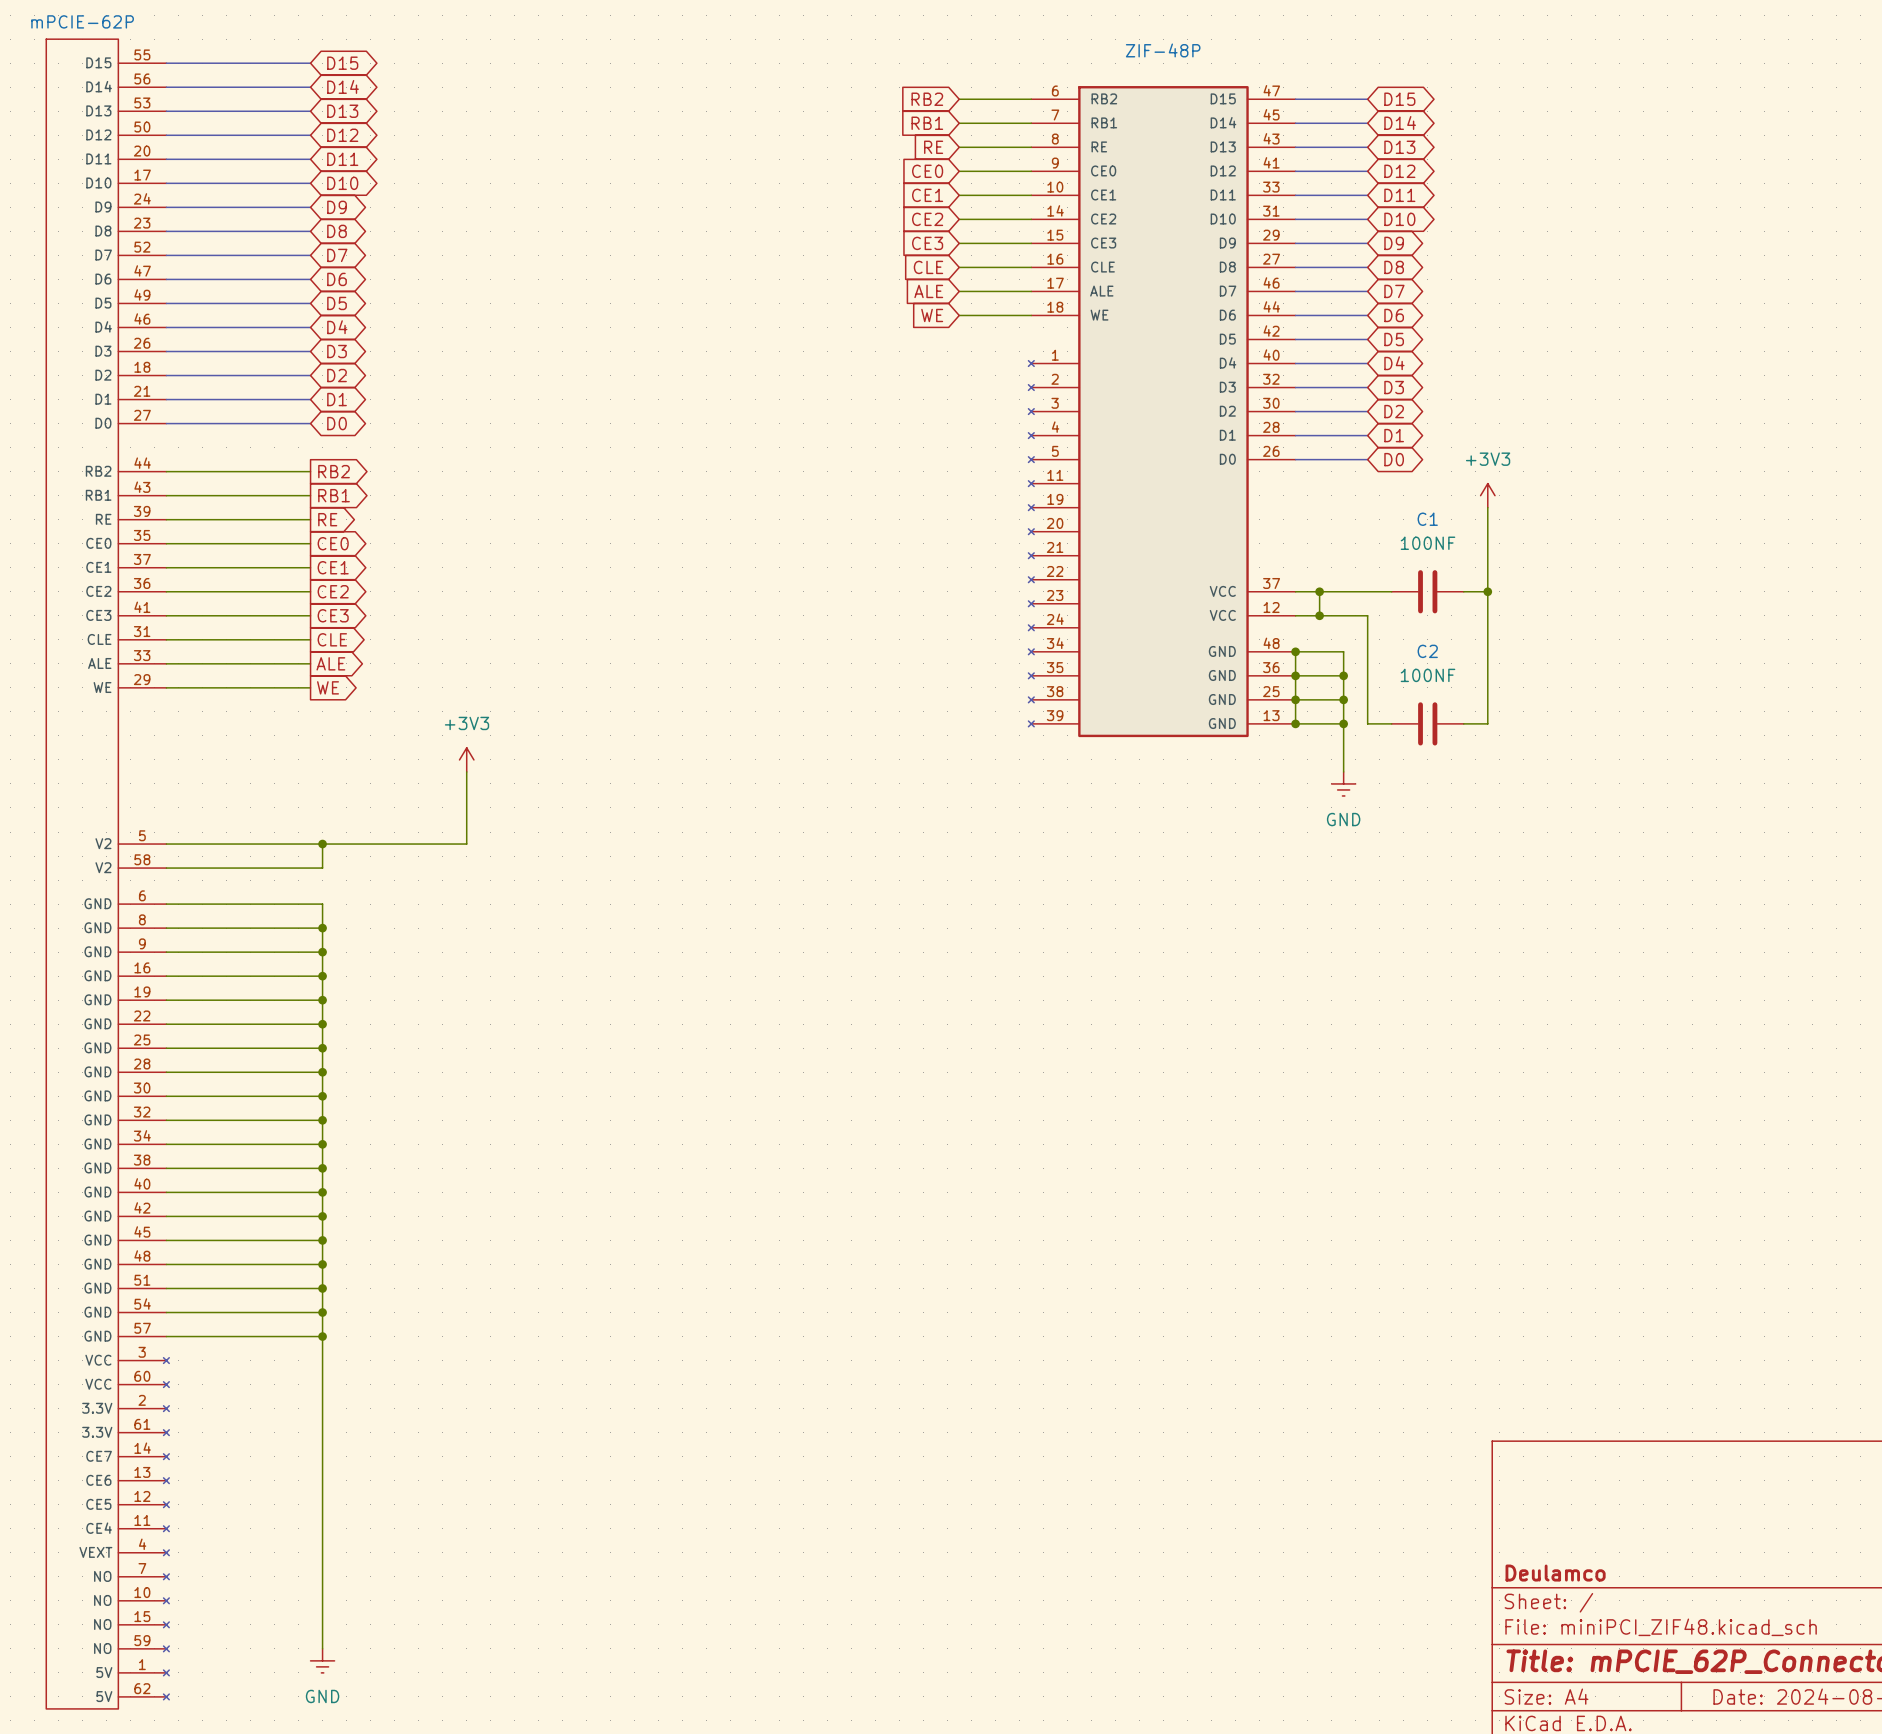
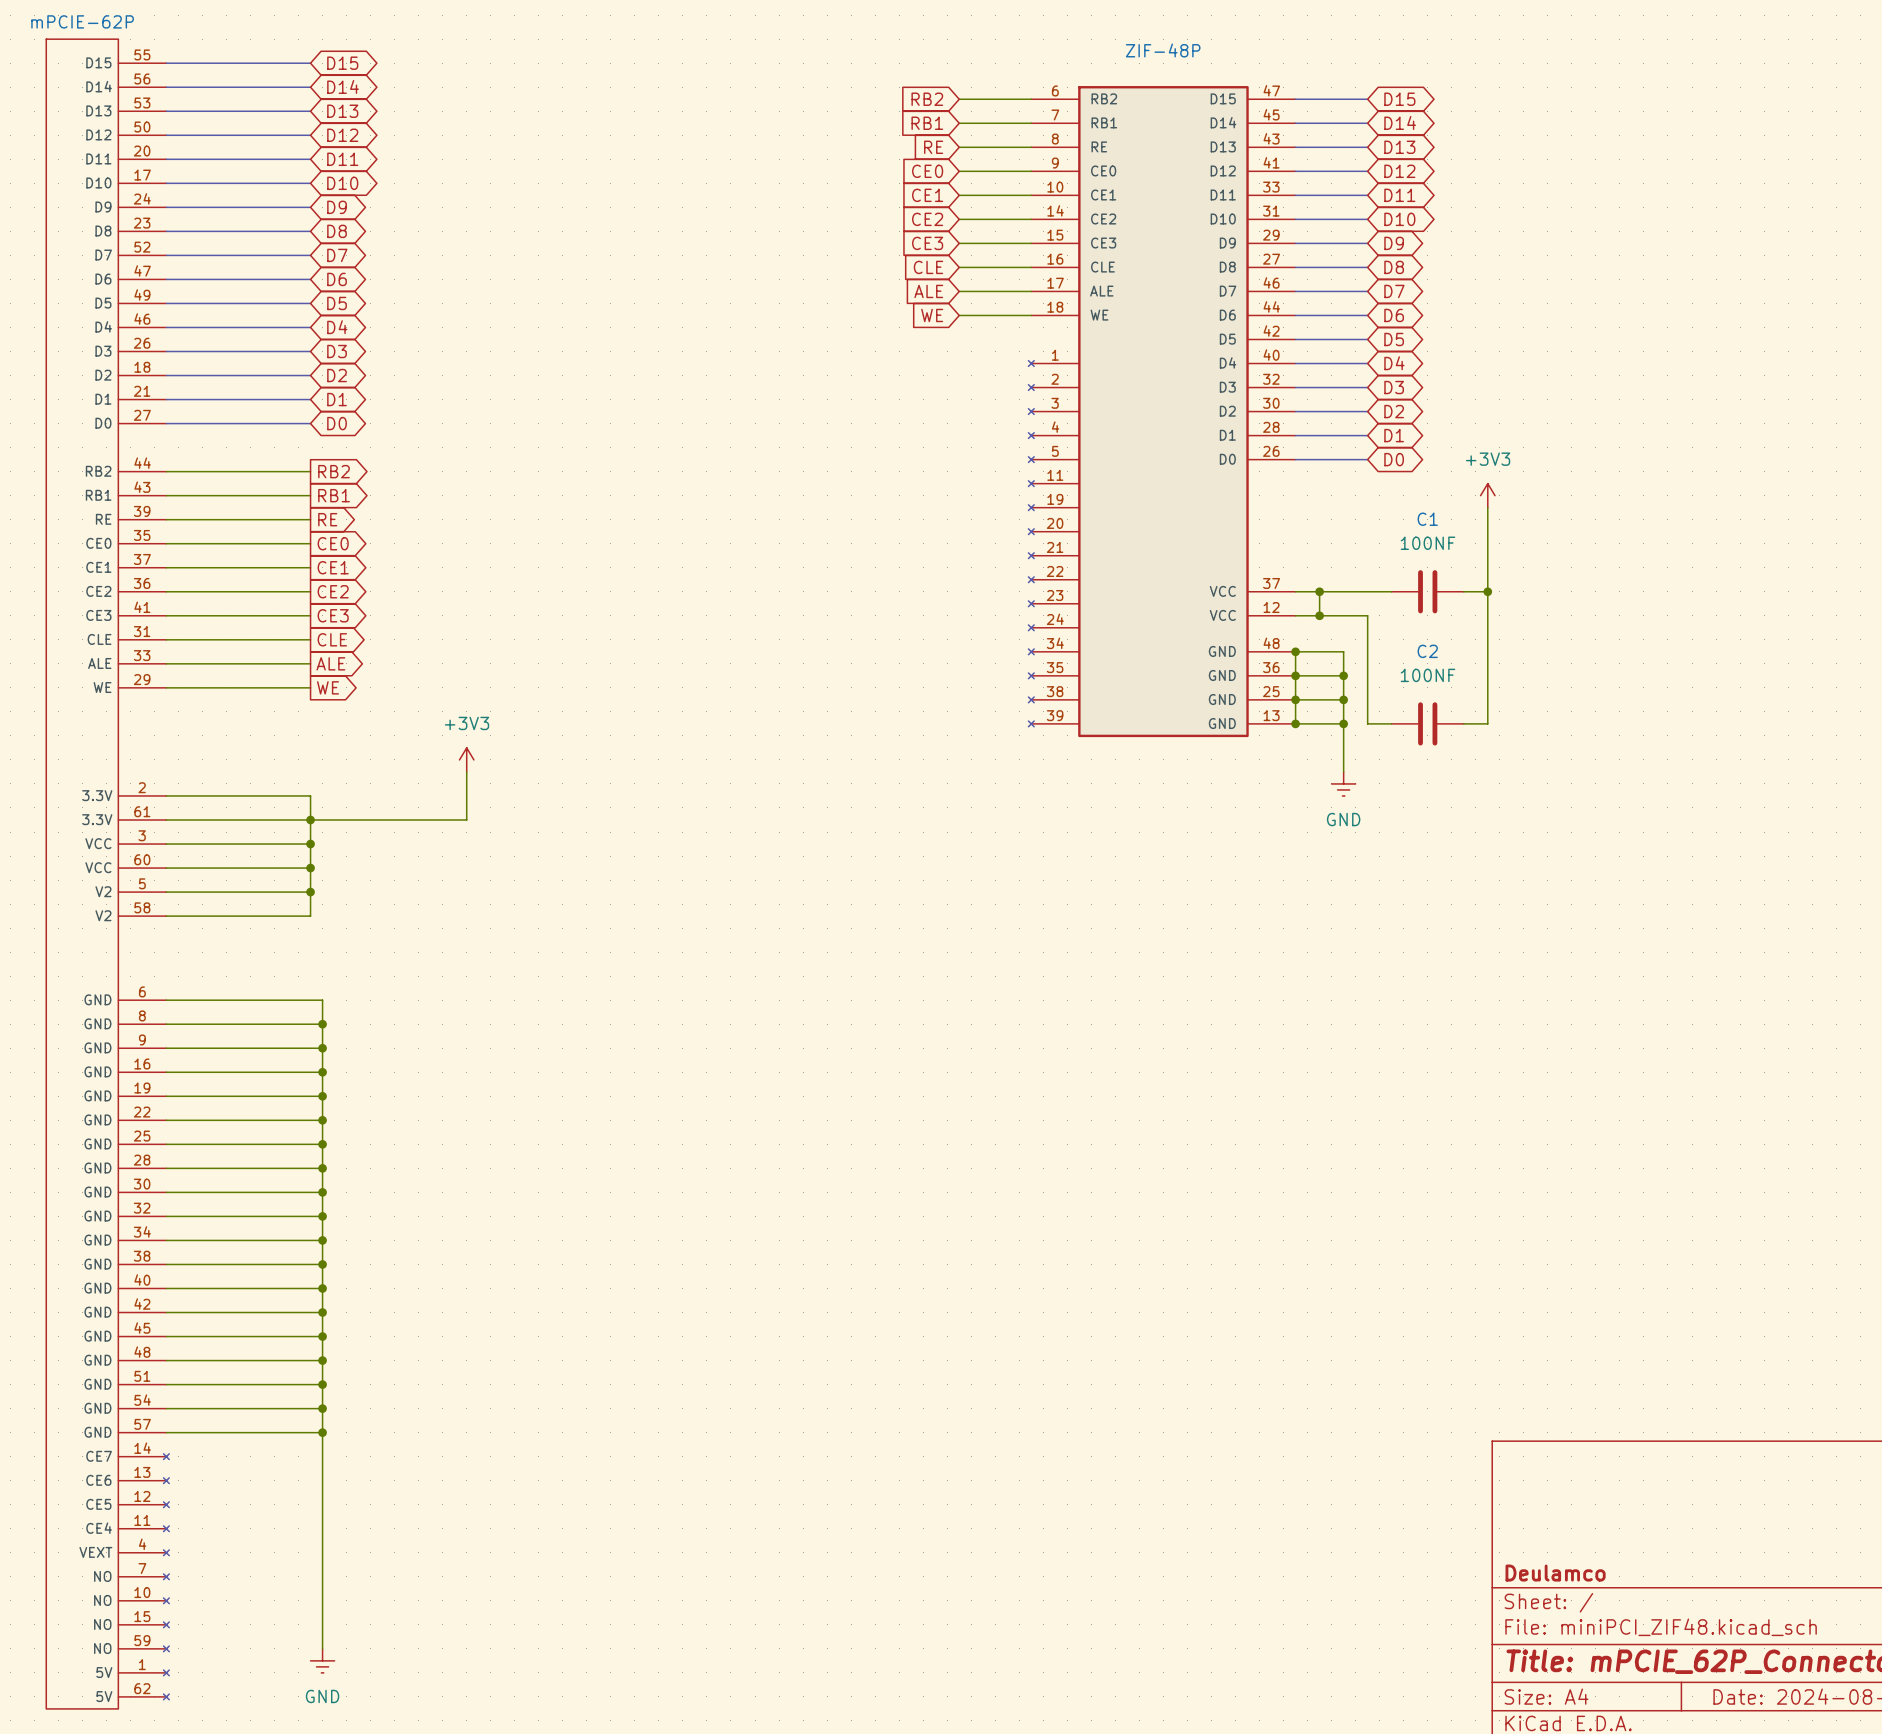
mPCIE-62P symbol: [46, 39, 170, 1709] -> [46, 39, 170, 1709]
wire: none -> (166, 795) (310, 795) (310, 916) (166, 916)
junction: none -> (310, 820)
wire: (466, 820) (466, 844) (310, 844) -> (466, 820) (166, 820)
wire: (322, 844) (322, 868) (310, 868) -> none
junction position: (322, 844) -> (310, 844)
junction: none -> (310, 868)
wire: none -> (166, 892) (310, 892)
junction: none -> (310, 892)
wire: (166, 904) (322, 904) (322, 1000) -> none
wire: (166, 928) (322, 928) -> none
junction: (322, 928) -> none
wire: (166, 952) (322, 952) -> none
junction: (322, 952) -> none
wire: (166, 976) (322, 976) -> none
junction: (322, 976) -> none
junction: (322, 1000) -> none
wire: none -> (166, 1360) (322, 1360)
junction: none -> (322, 1360)
wire: none -> (166, 1384) (322, 1384)
junction: none -> (322, 1384)
wire: none -> (166, 1408) (322, 1408)
junction: none -> (322, 1408)
wire: none -> (166, 1432) (322, 1432)
junction: none -> (322, 1432)

